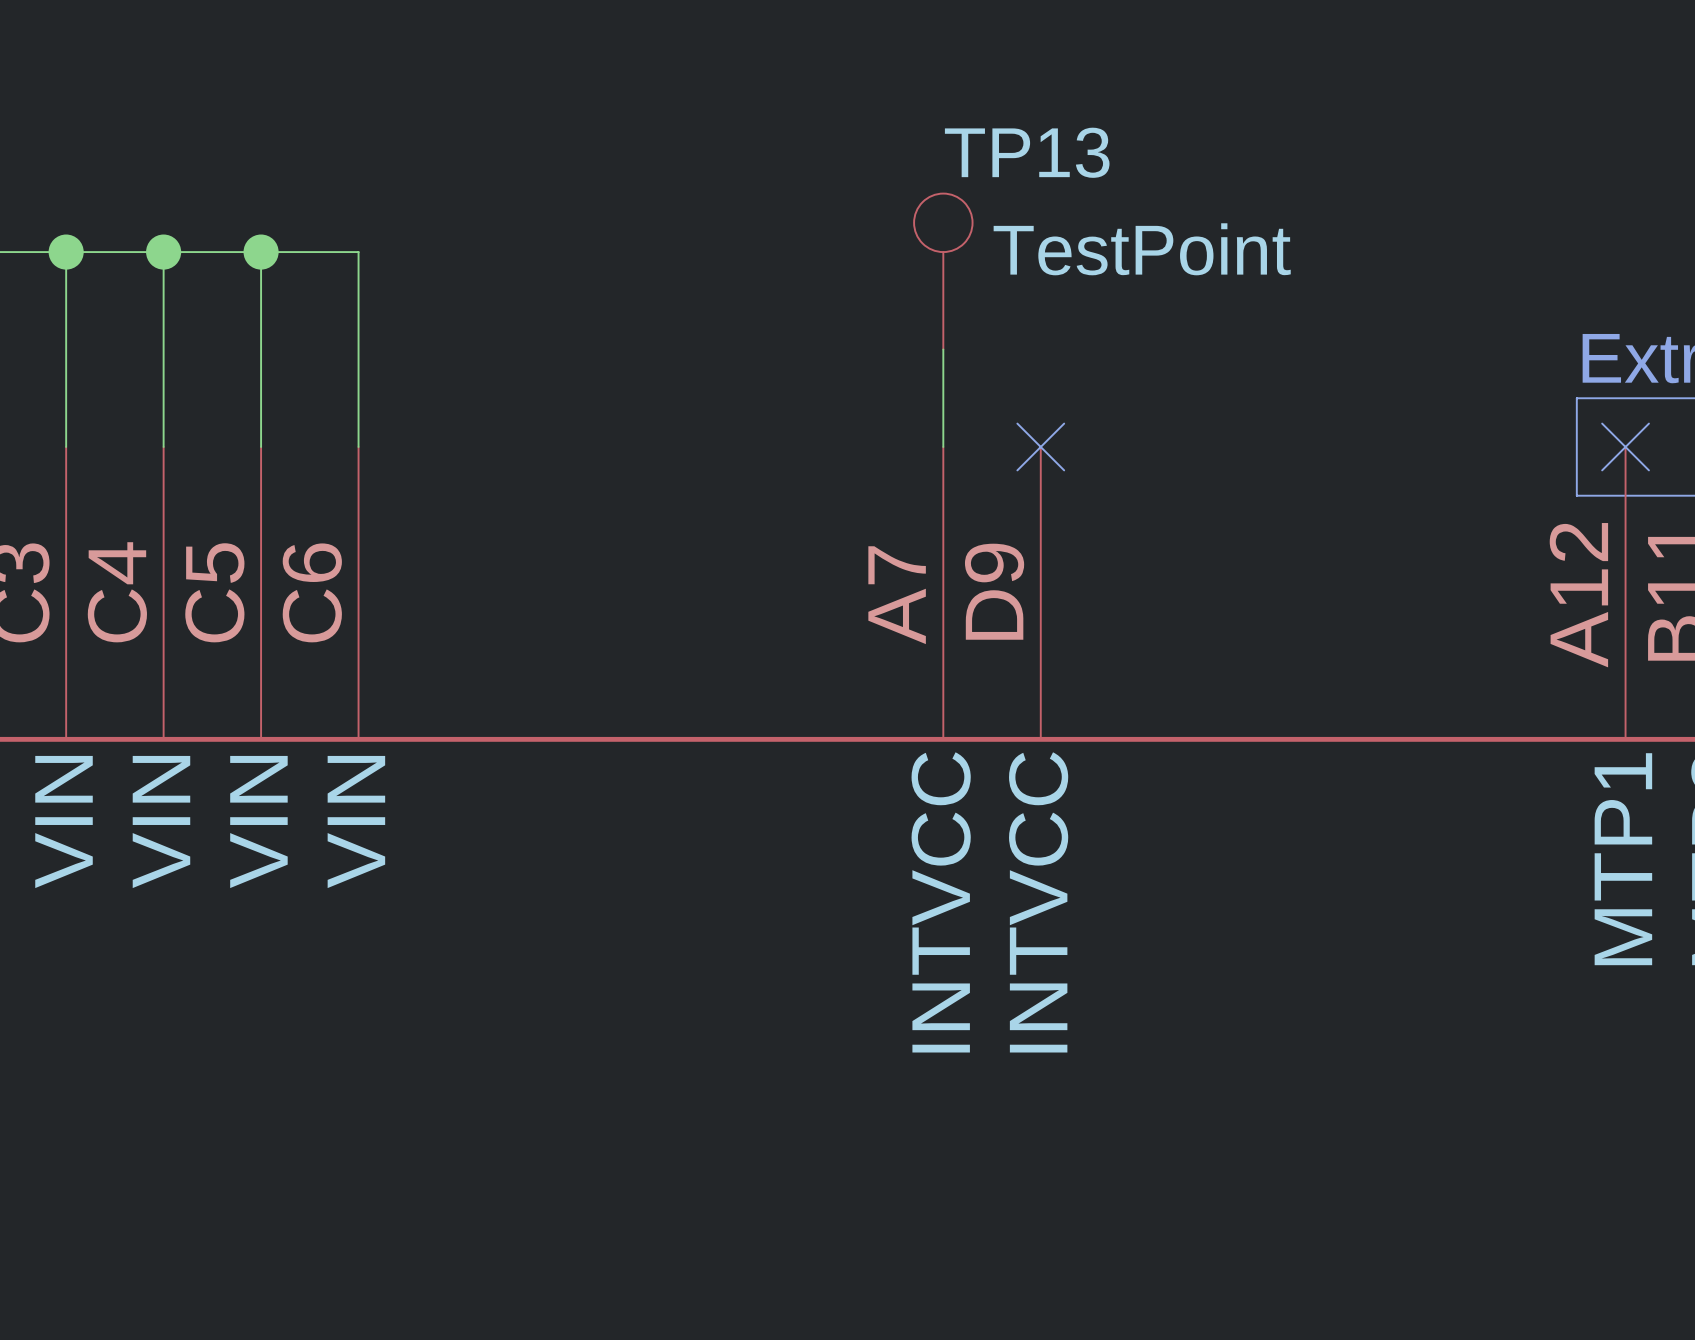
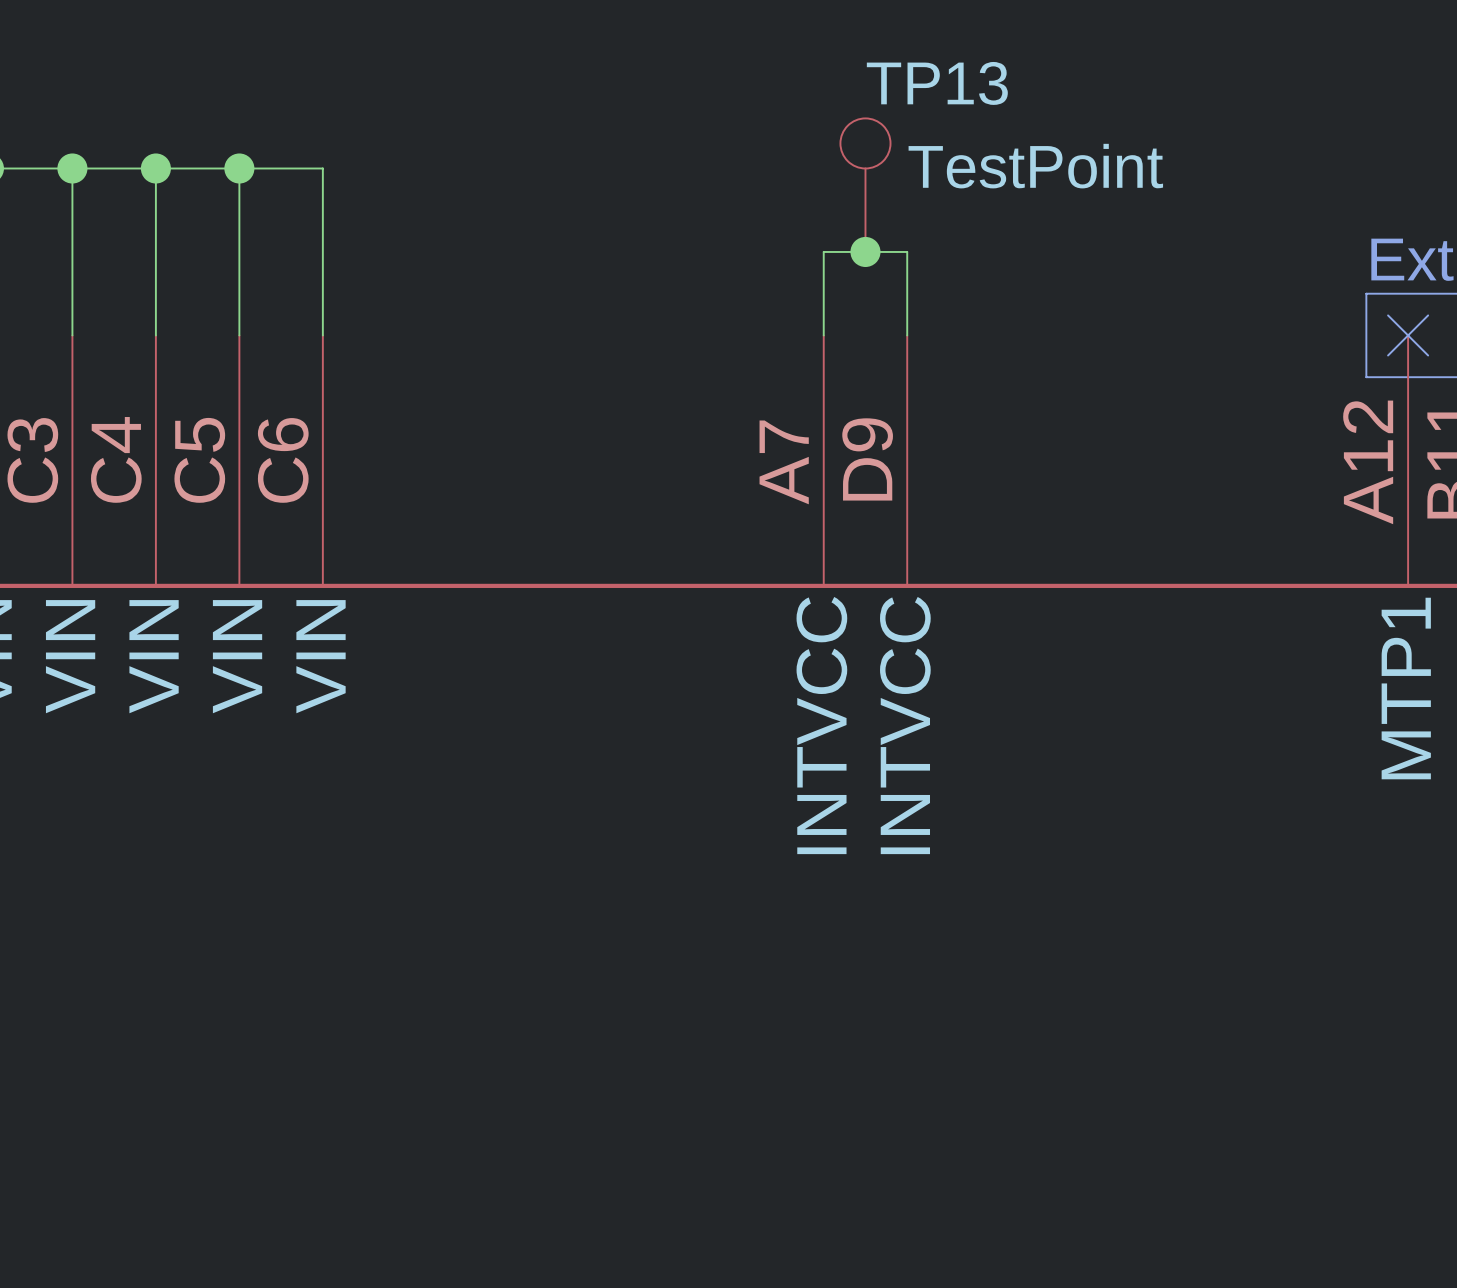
TP13 position: (943, 271) -> (865, 185)
wire: none -> (823, 251) (907, 251) (907, 335)
junction: none -> (865, 251)
no-connect mark: (1040, 446) -> none

